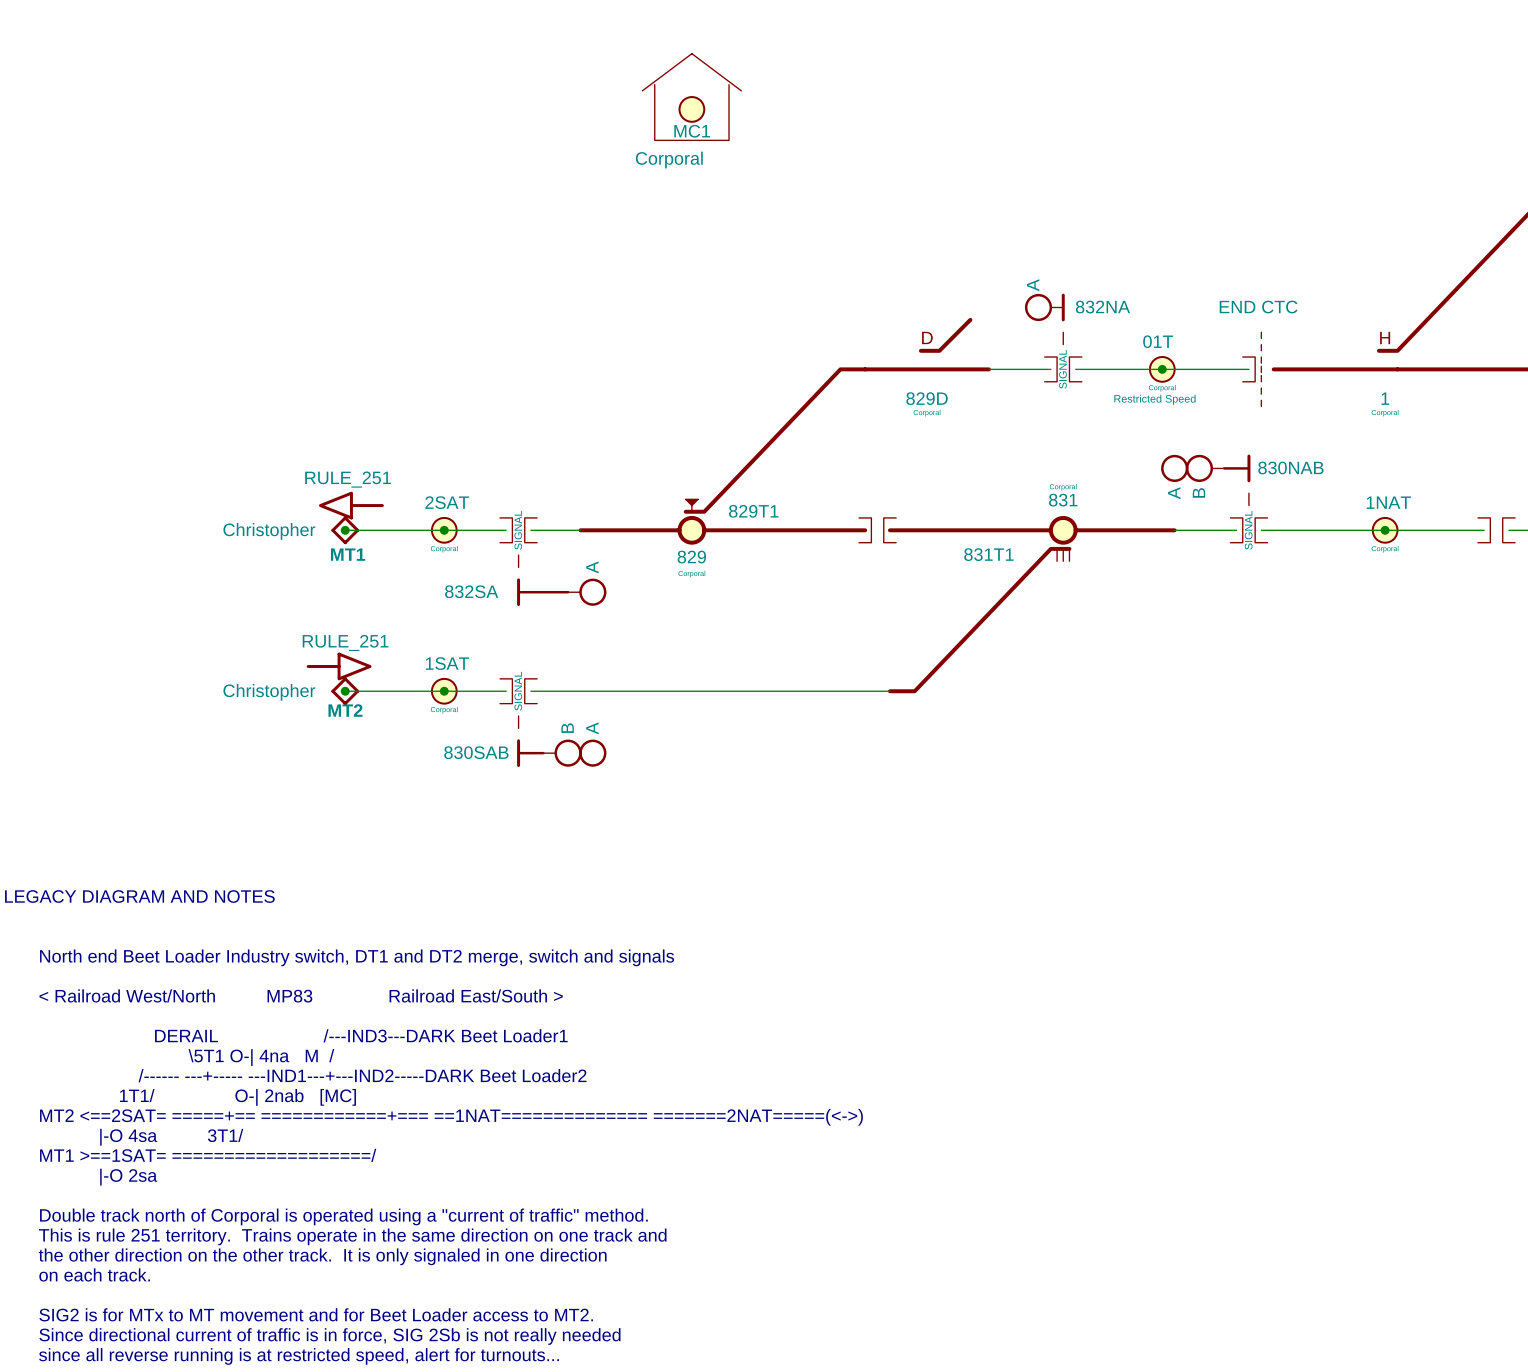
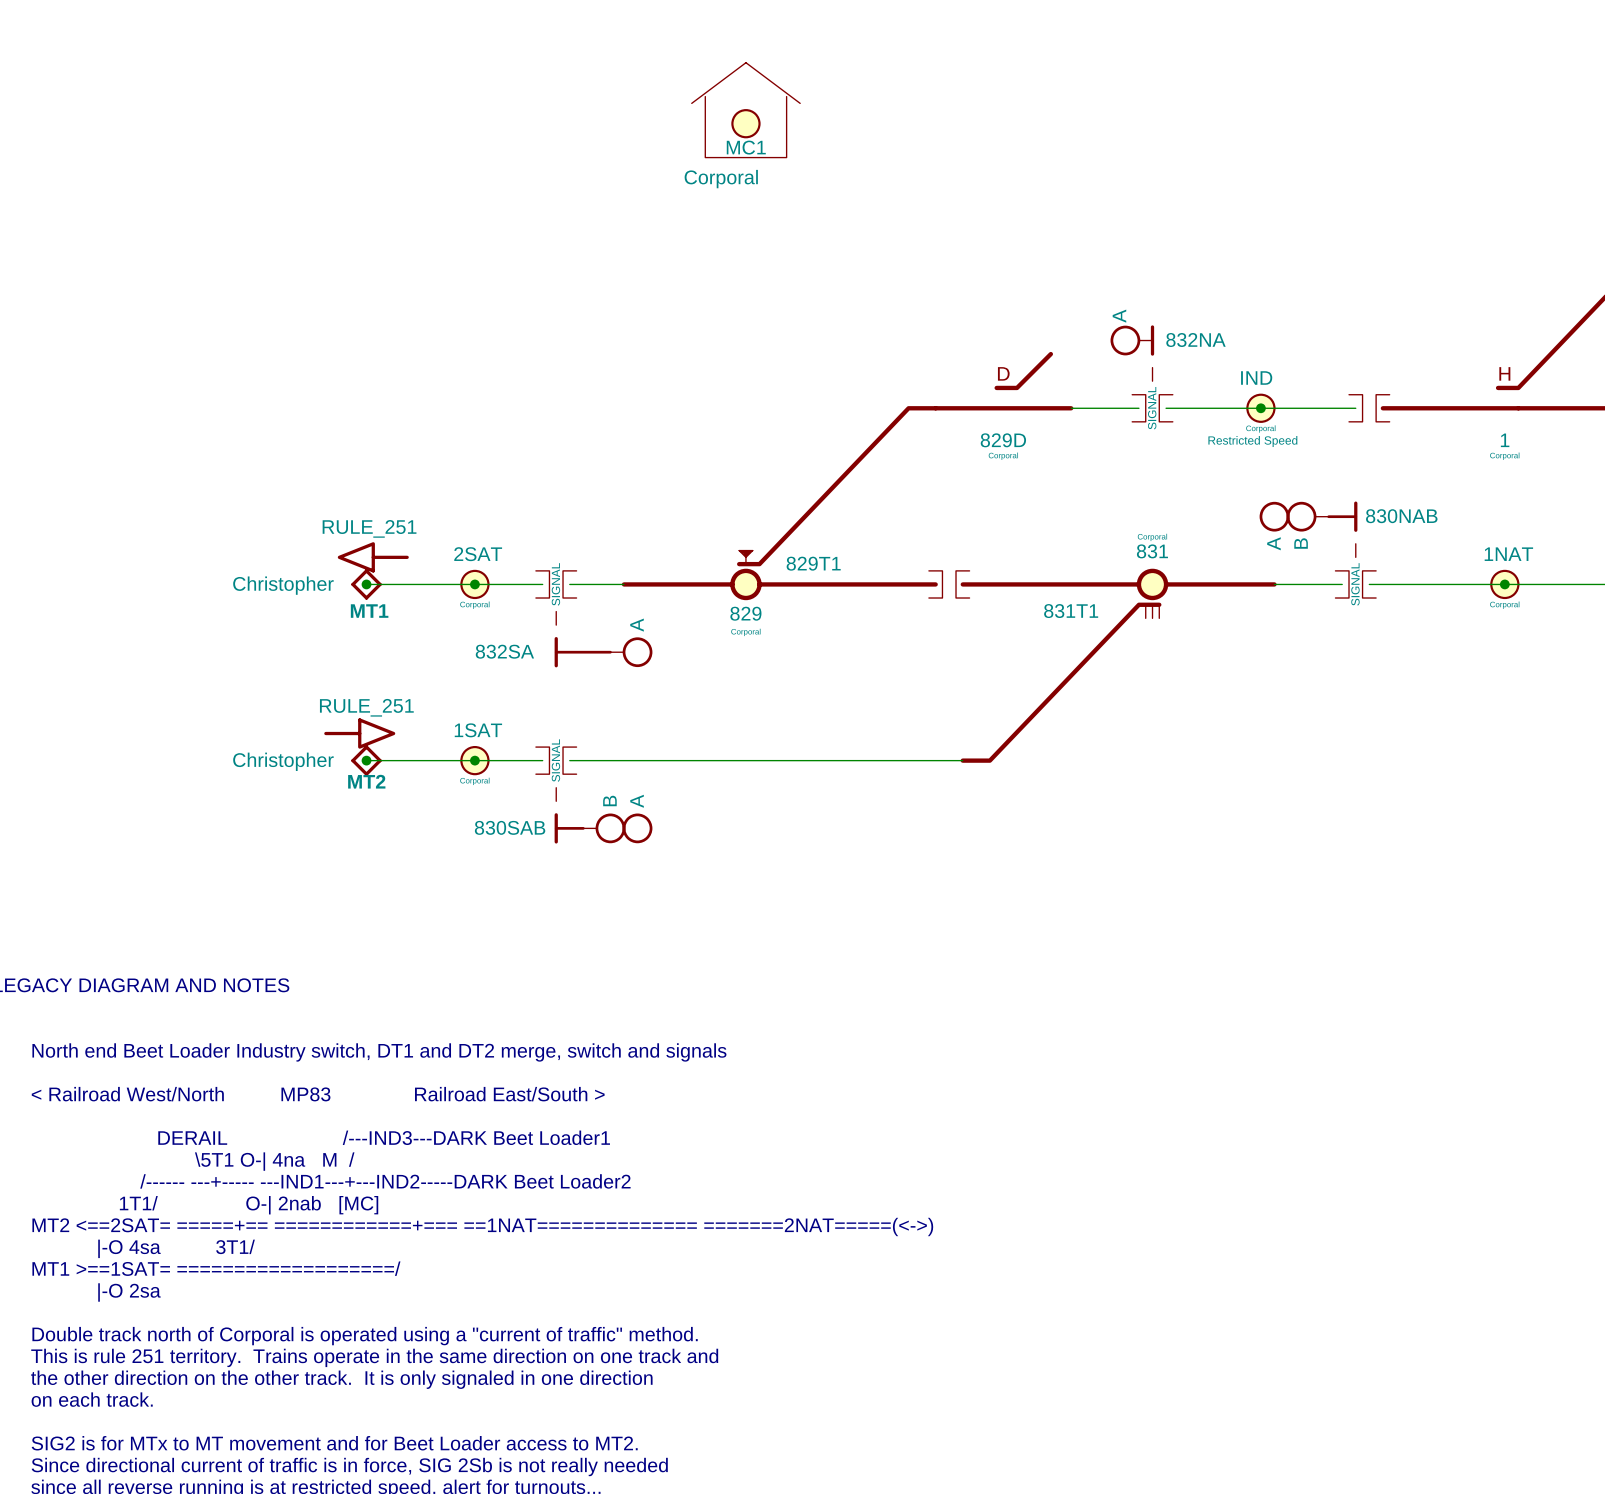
part value: END CTC (1258, 307) -> none
part symbol: [1242, 332, 1262, 407] -> [1349, 394, 1390, 422]
part value: 01T (1158, 341) -> IND (1256, 378)

